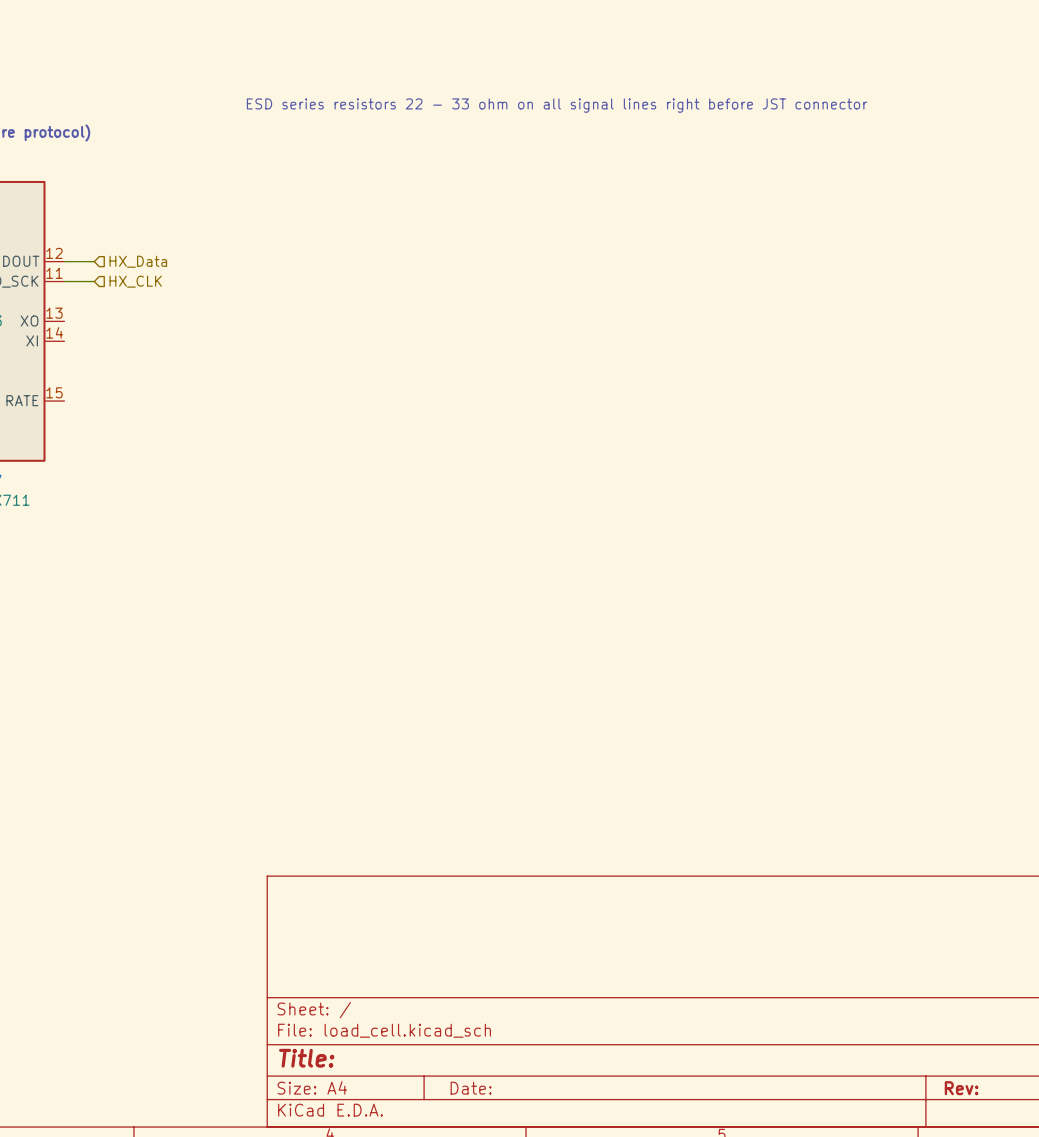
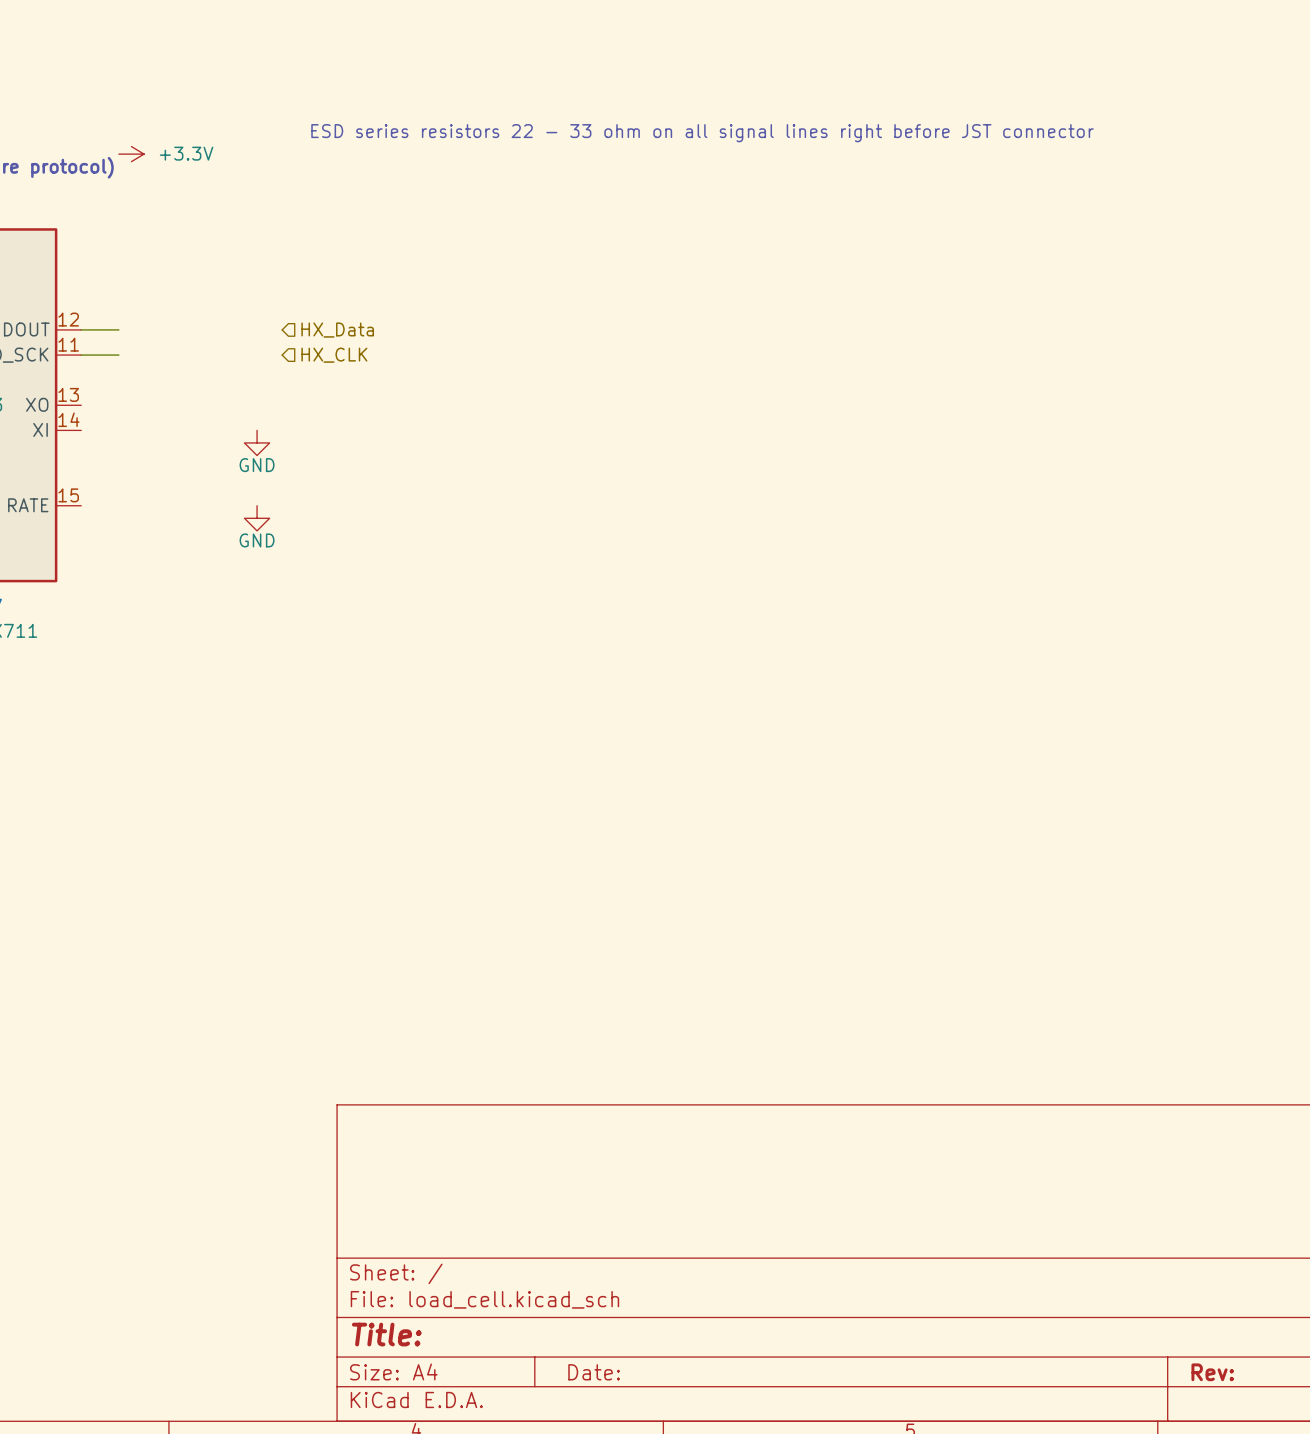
power symbol: none -> +3.3V (131, 154)
hierarchical label position: HX_Data (138, 261) -> HX_Data (337, 330)
hierarchical label position: HX_CLK (135, 281) -> HX_CLK (334, 355)
power symbol: none -> GND (257, 442)
power symbol: none -> GND (257, 518)

